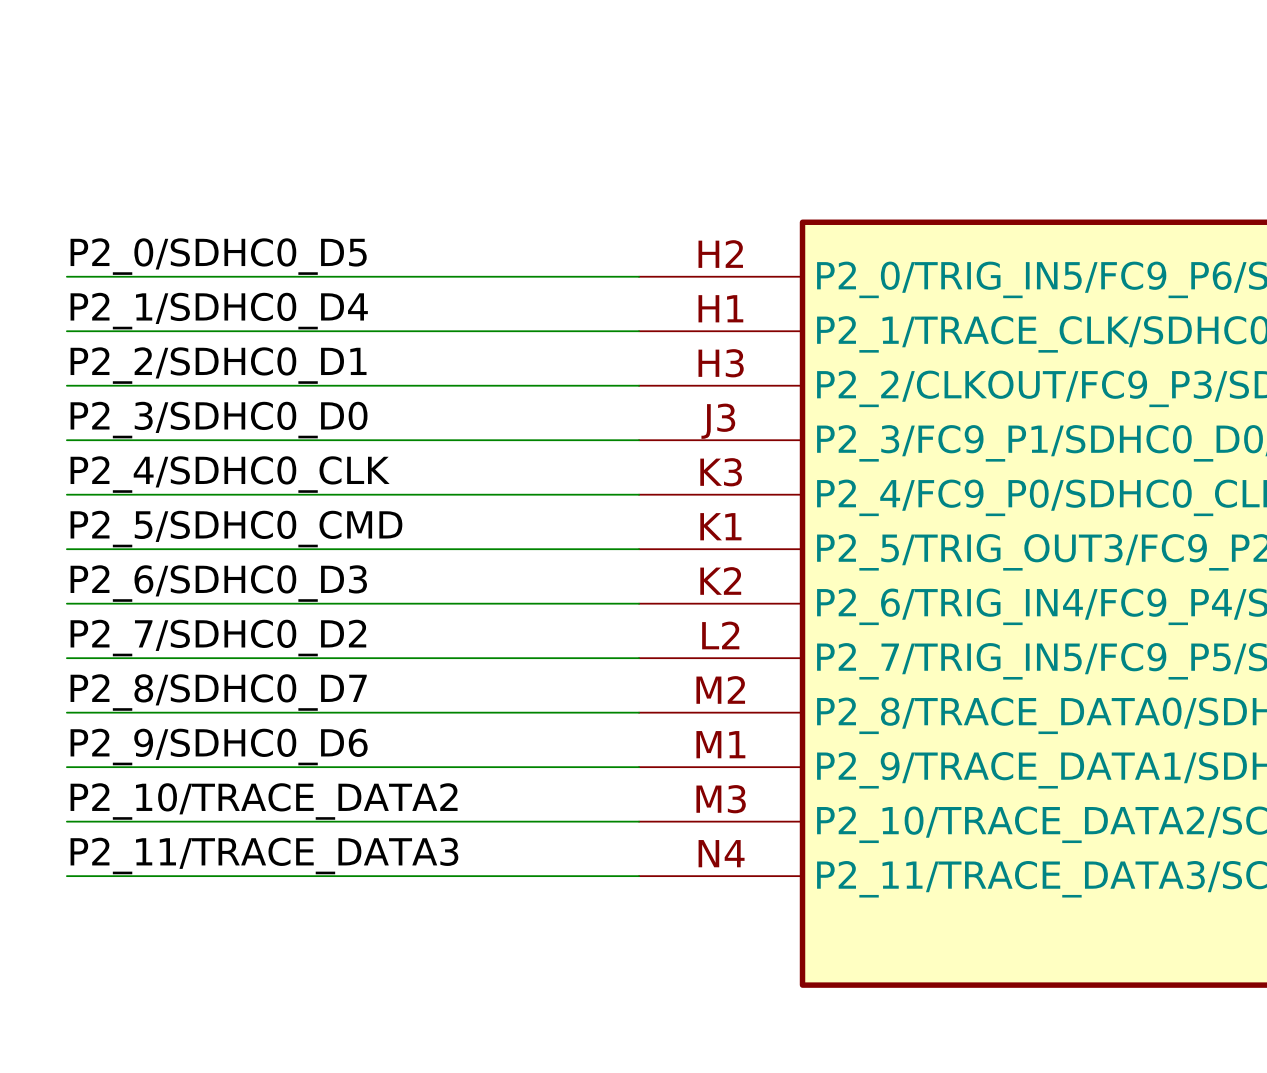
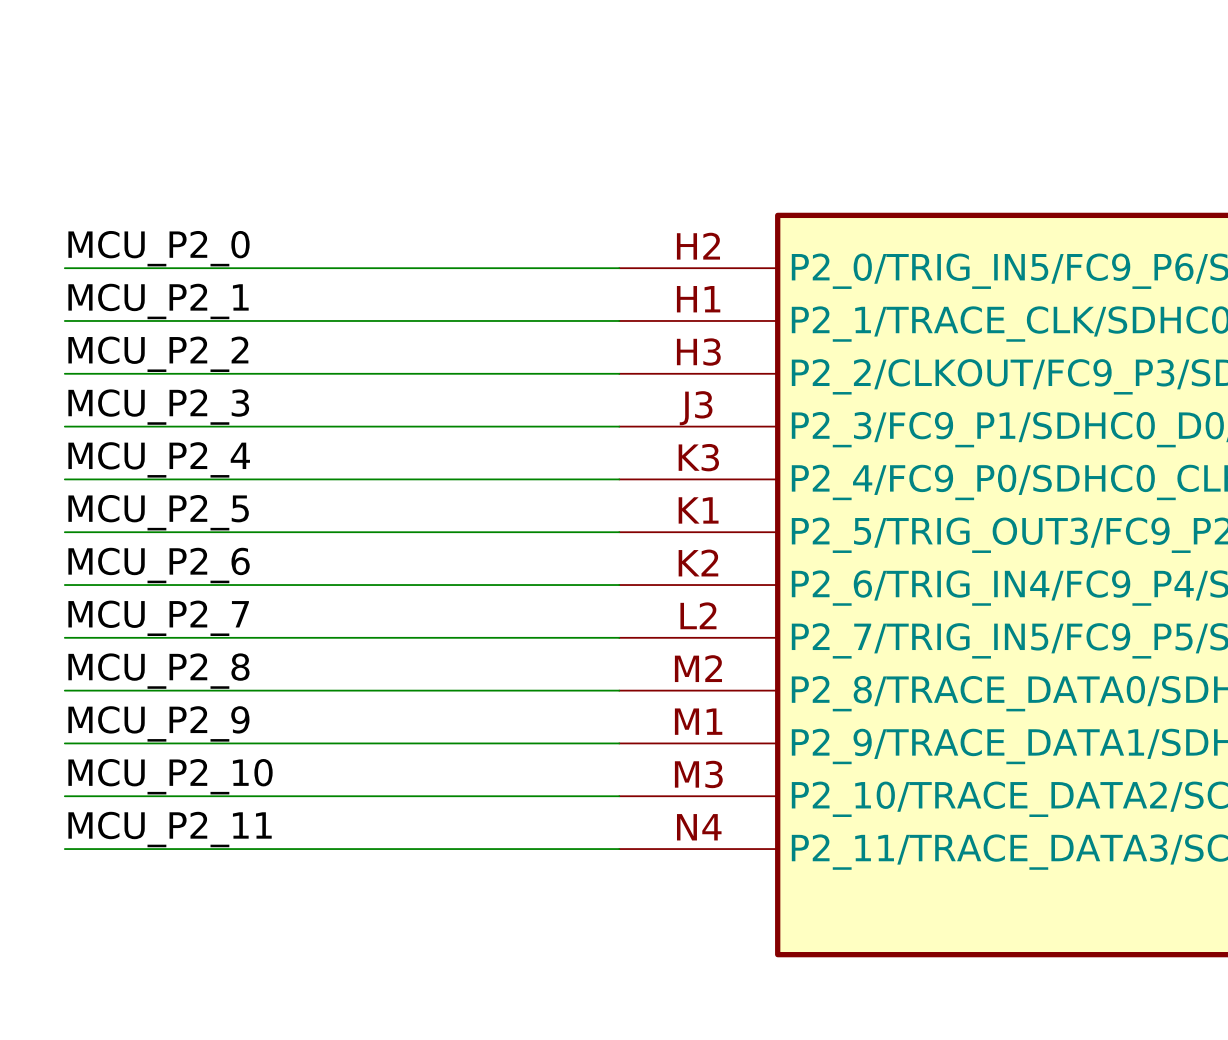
label: P2_0/SDHC0_D5 (218, 256) -> MCU_P2_0 (158, 248)
label: P2_1/SDHC0_D4 (219, 311) -> MCU_P2_1 (158, 301)
label: P2_2/SDHC0_D1 (218, 365) -> MCU_P2_2 (158, 354)
label: P2_3/SDHC0_D0 (219, 420) -> MCU_P2_3 (158, 407)
label: P2_4/SDHC0_CLK (230, 474) -> MCU_P2_4 (159, 459)
label: P2_5/SDHC0_CMD (236, 529) -> MCU_P2_5 (158, 512)
label: P2_6/SDHC0_D3 (218, 583) -> MCU_P2_6 (159, 565)
label: P2_7/SDHC0_D2 (218, 638) -> MCU_P2_7 (158, 618)
label: P2_8/SDHC0_D7 (218, 692) -> MCU_P2_8 (158, 671)
label: P2_9/SDHC0_D6 (219, 747) -> MCU_P2_9 (158, 723)
label: P2_10/TRACE_DATA2 (264, 801) -> MCU_P2_10 (170, 776)
label: P2_11/TRACE_DATA3 (264, 855) -> MCU_P2_11 (170, 829)

